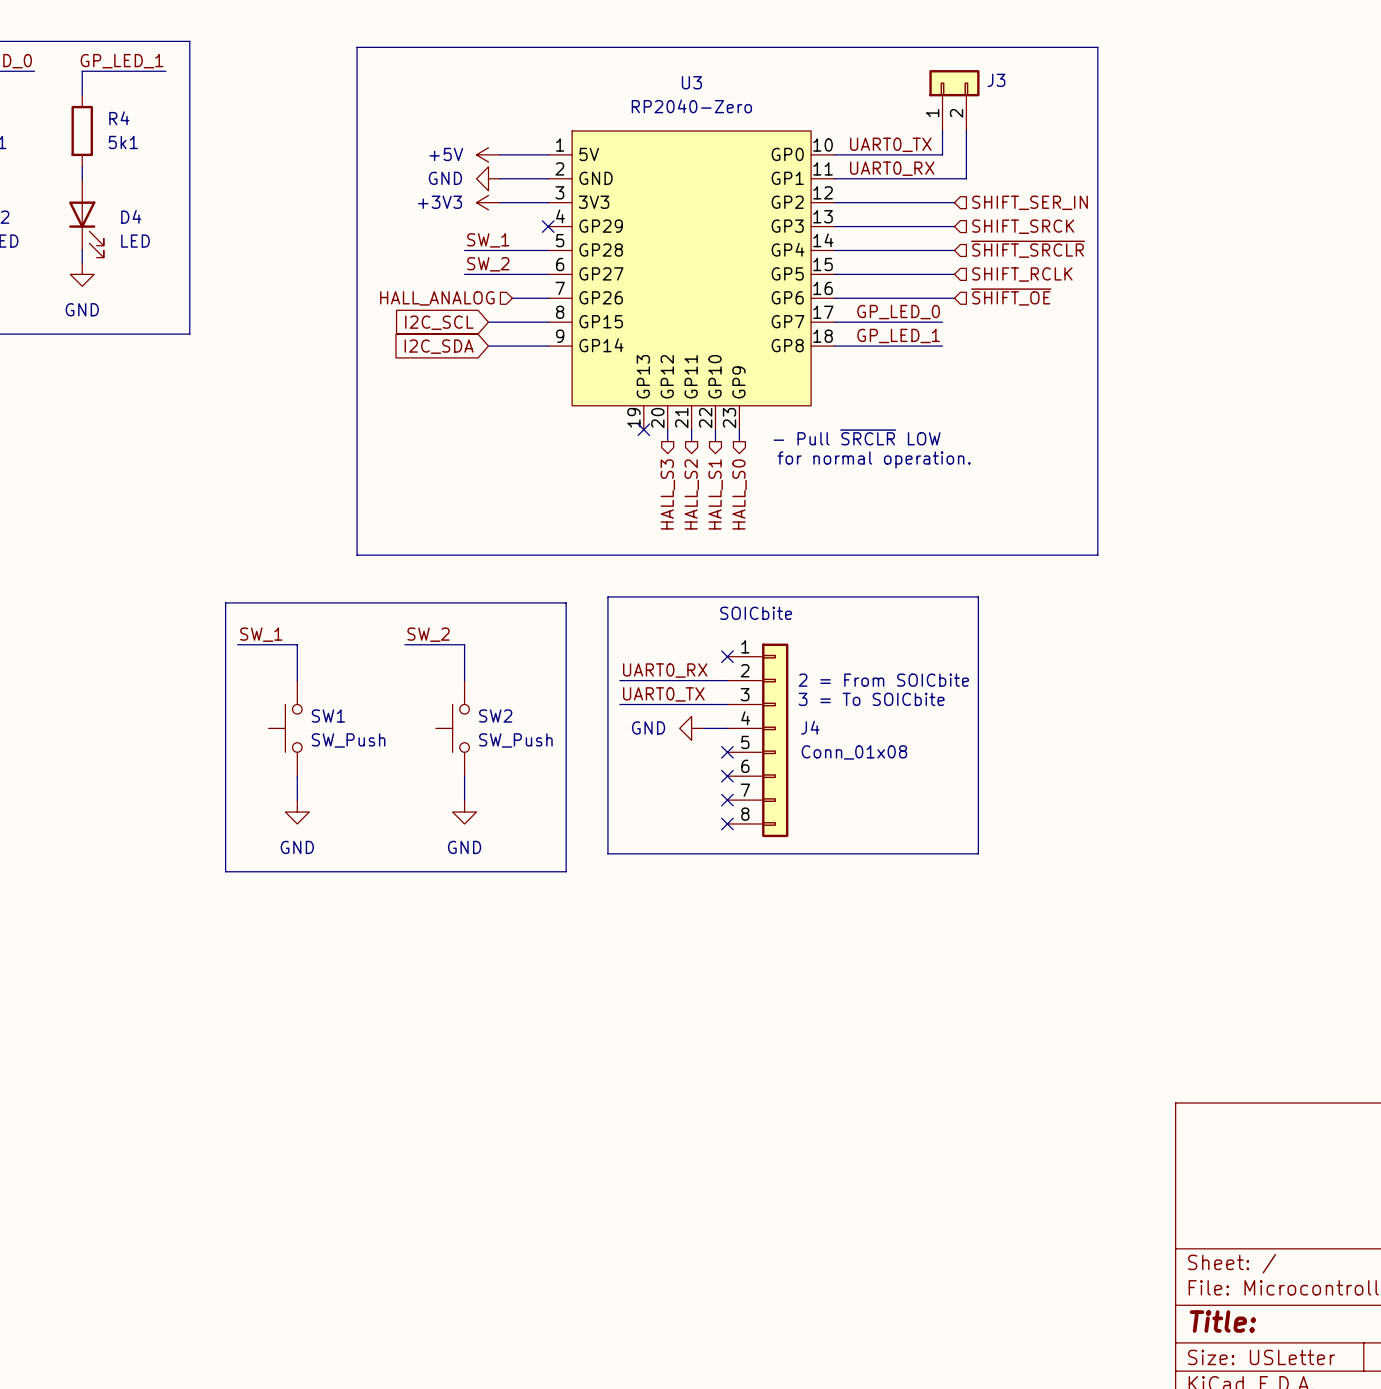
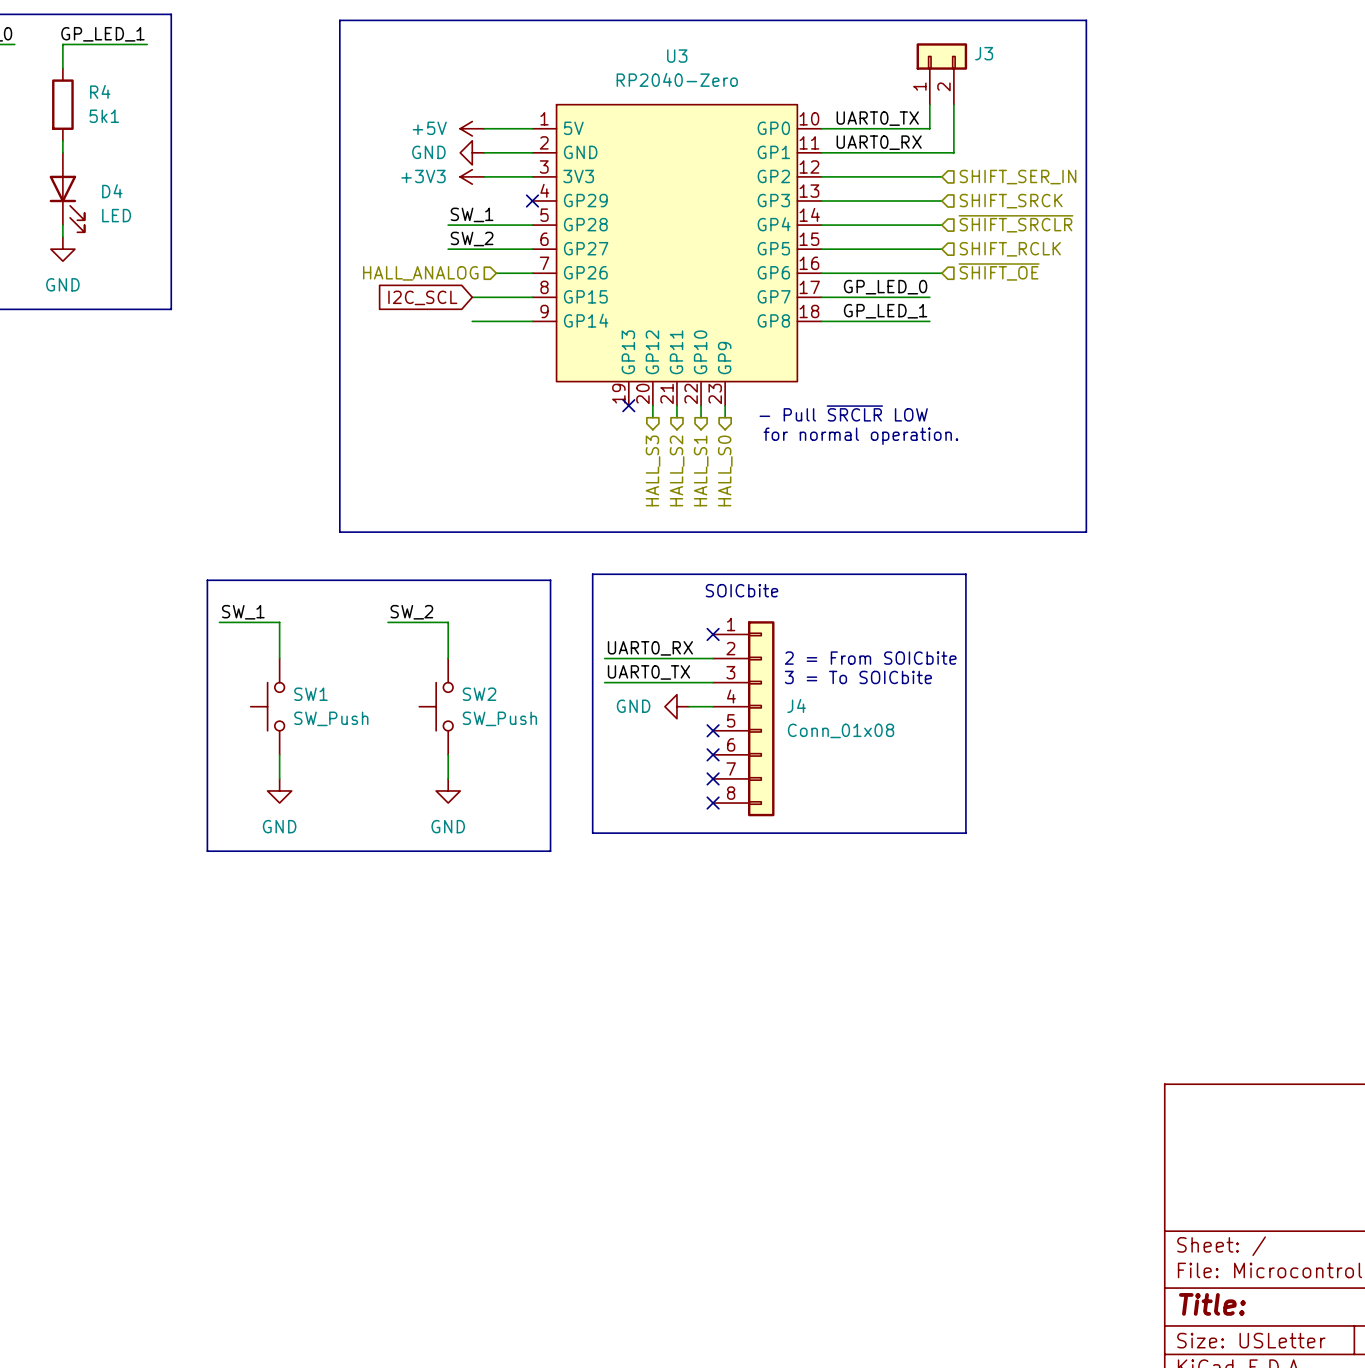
global label: I2C_SDA (439, 346) -> none

